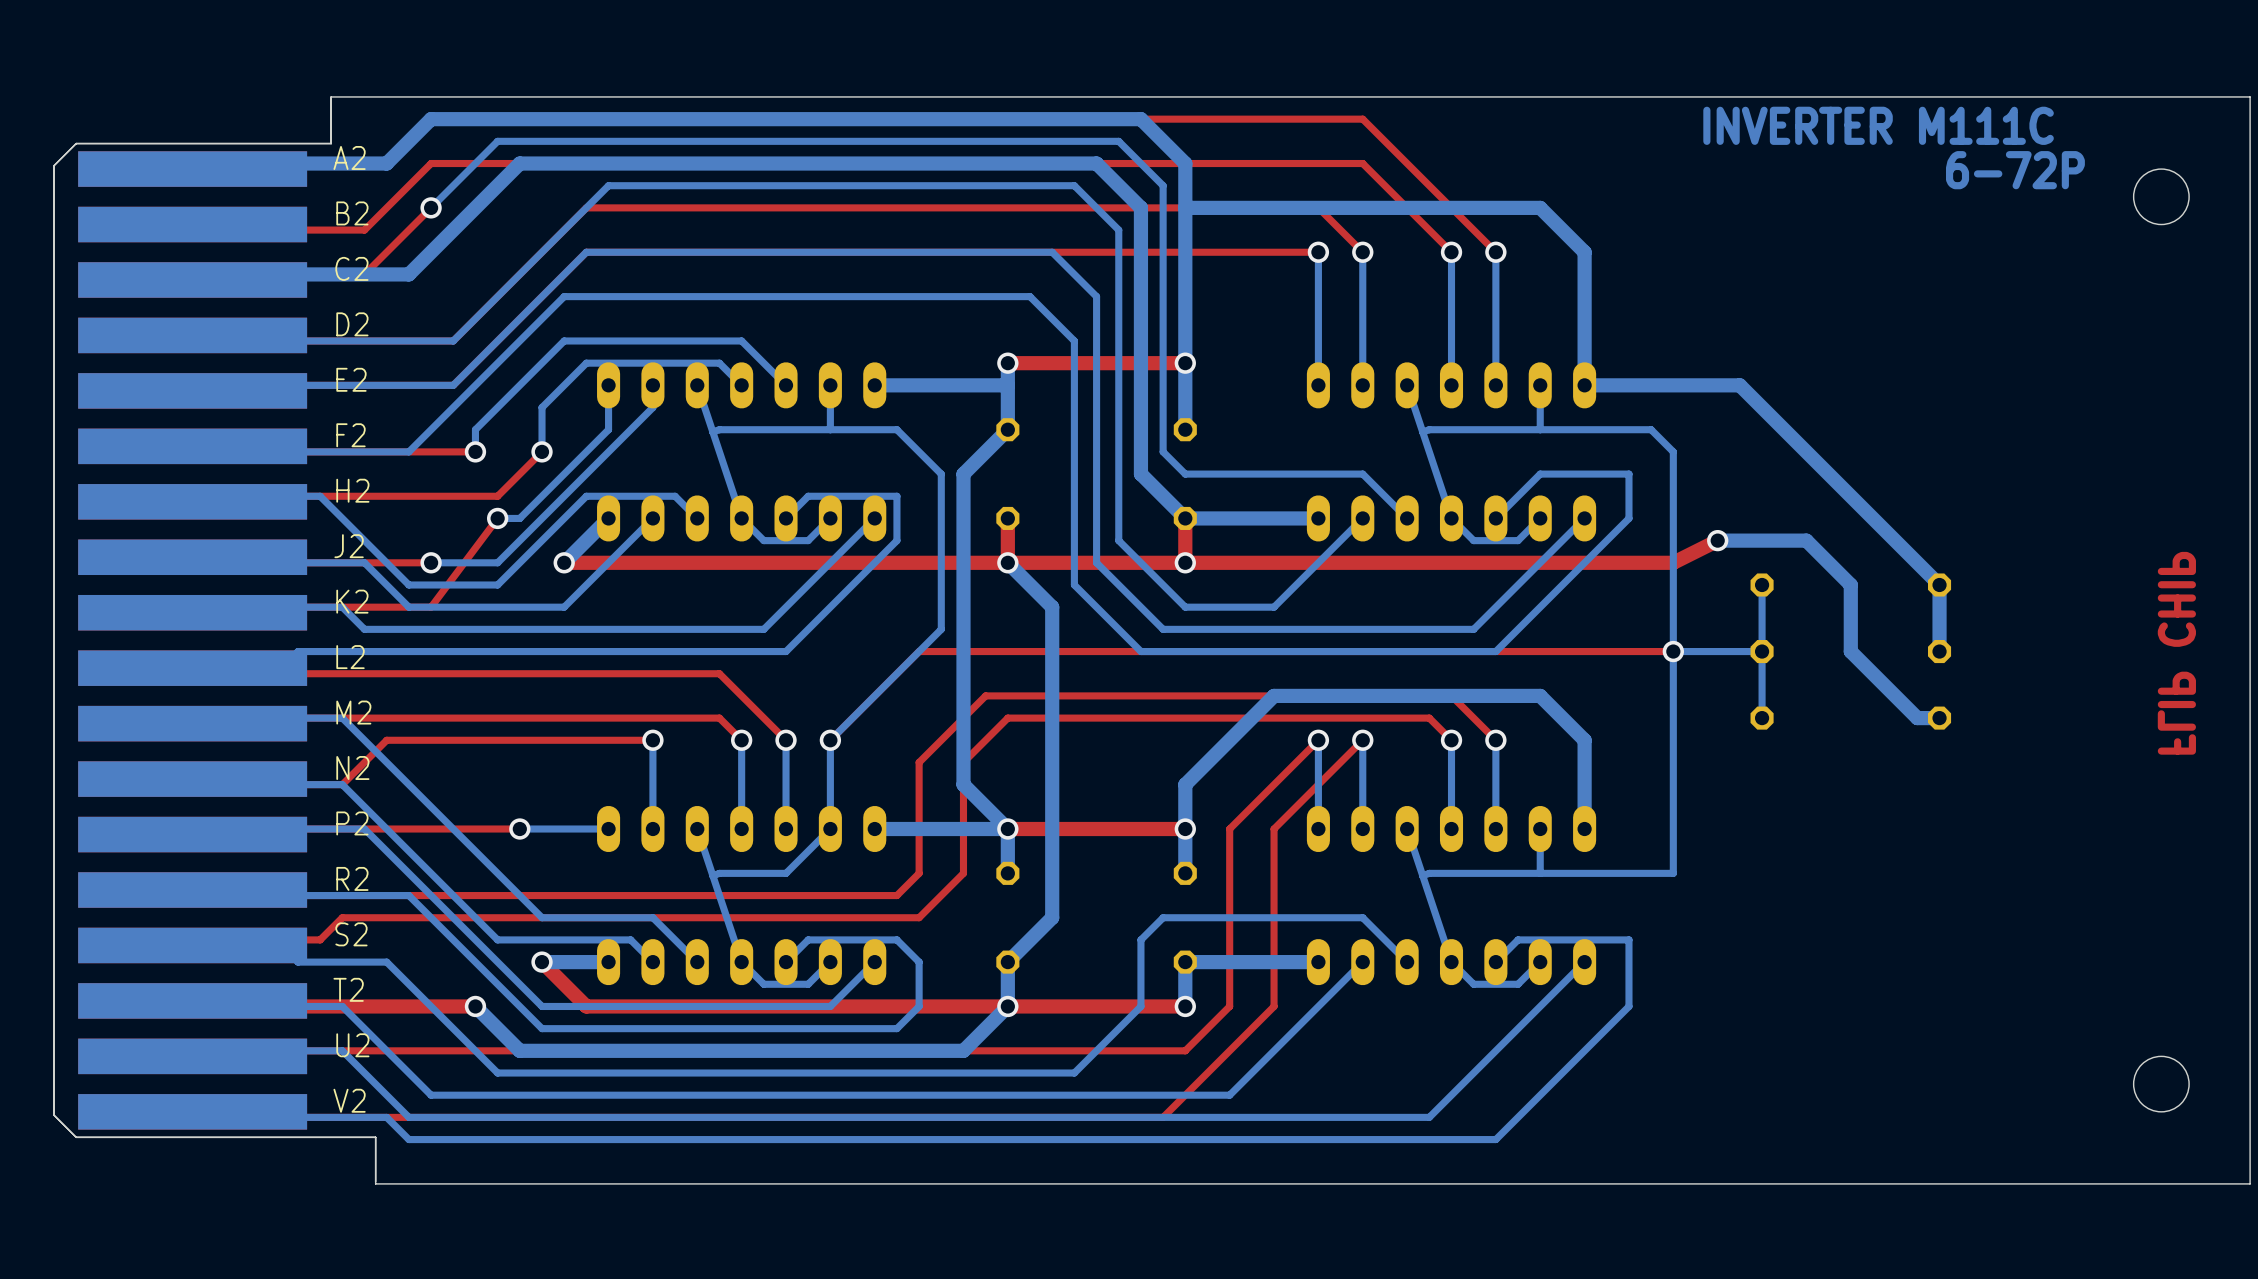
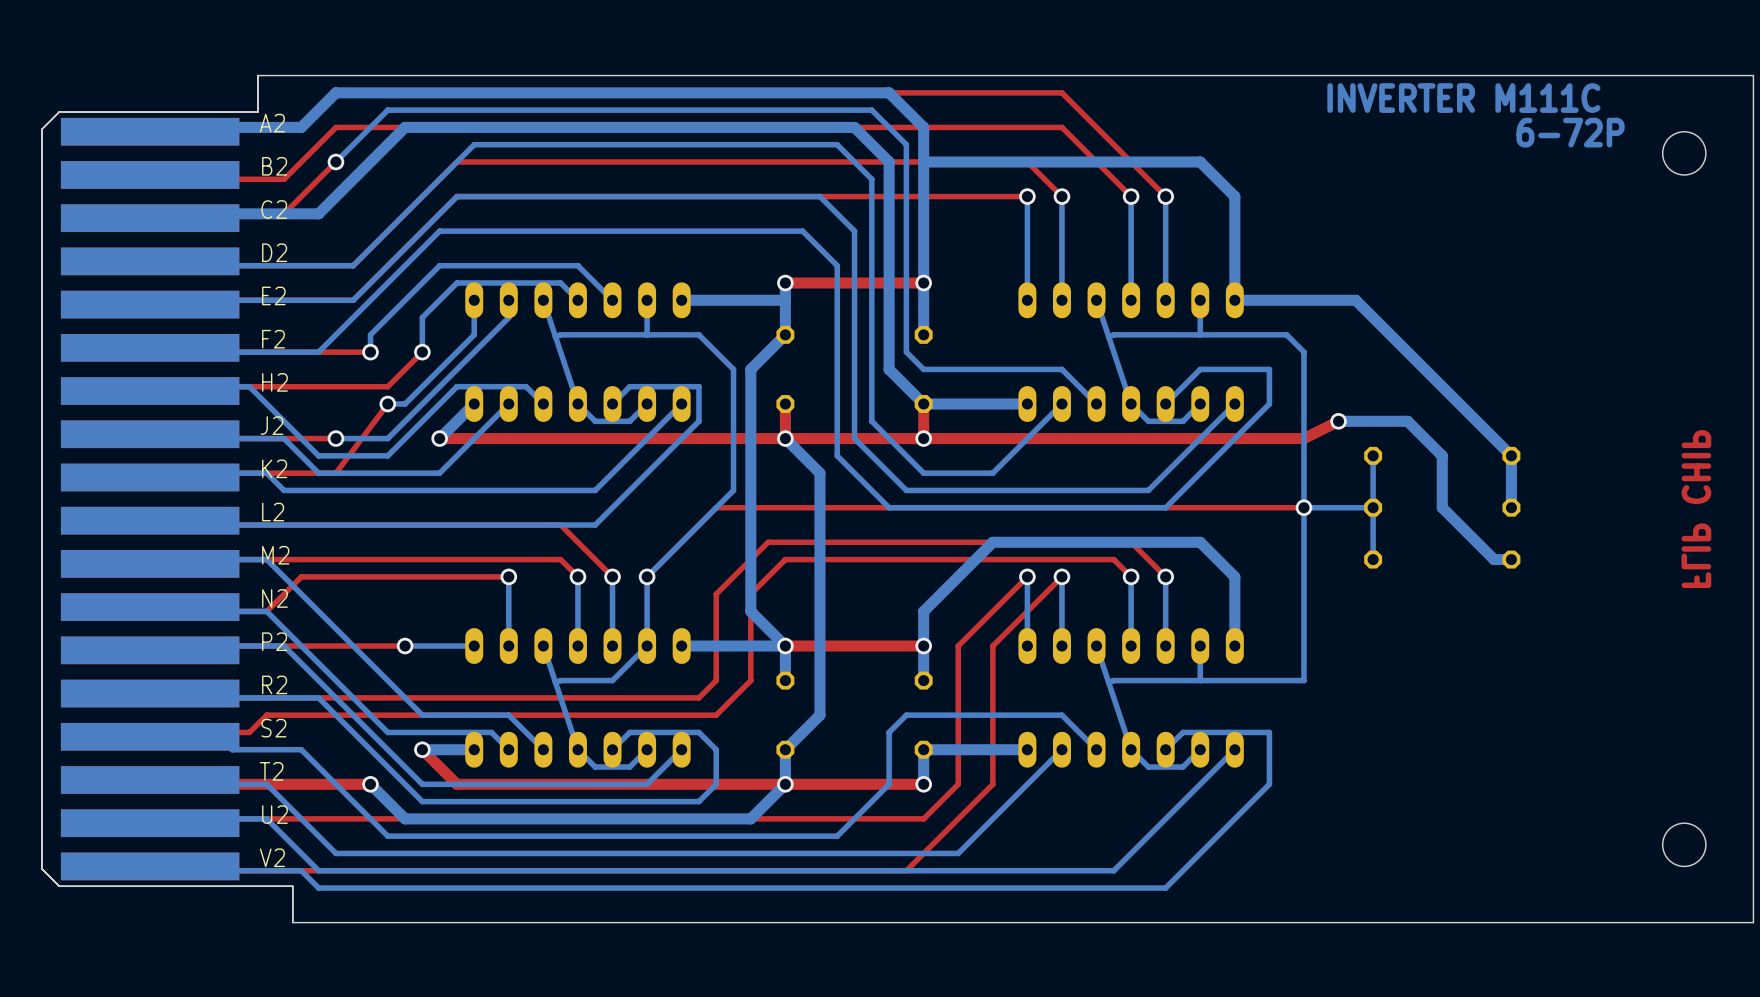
bottom track: (786, 651) (298, 651) (281, 667) (192, 668) -> (612, 507) (595, 525) (214, 525) (202, 520) (150, 520)

